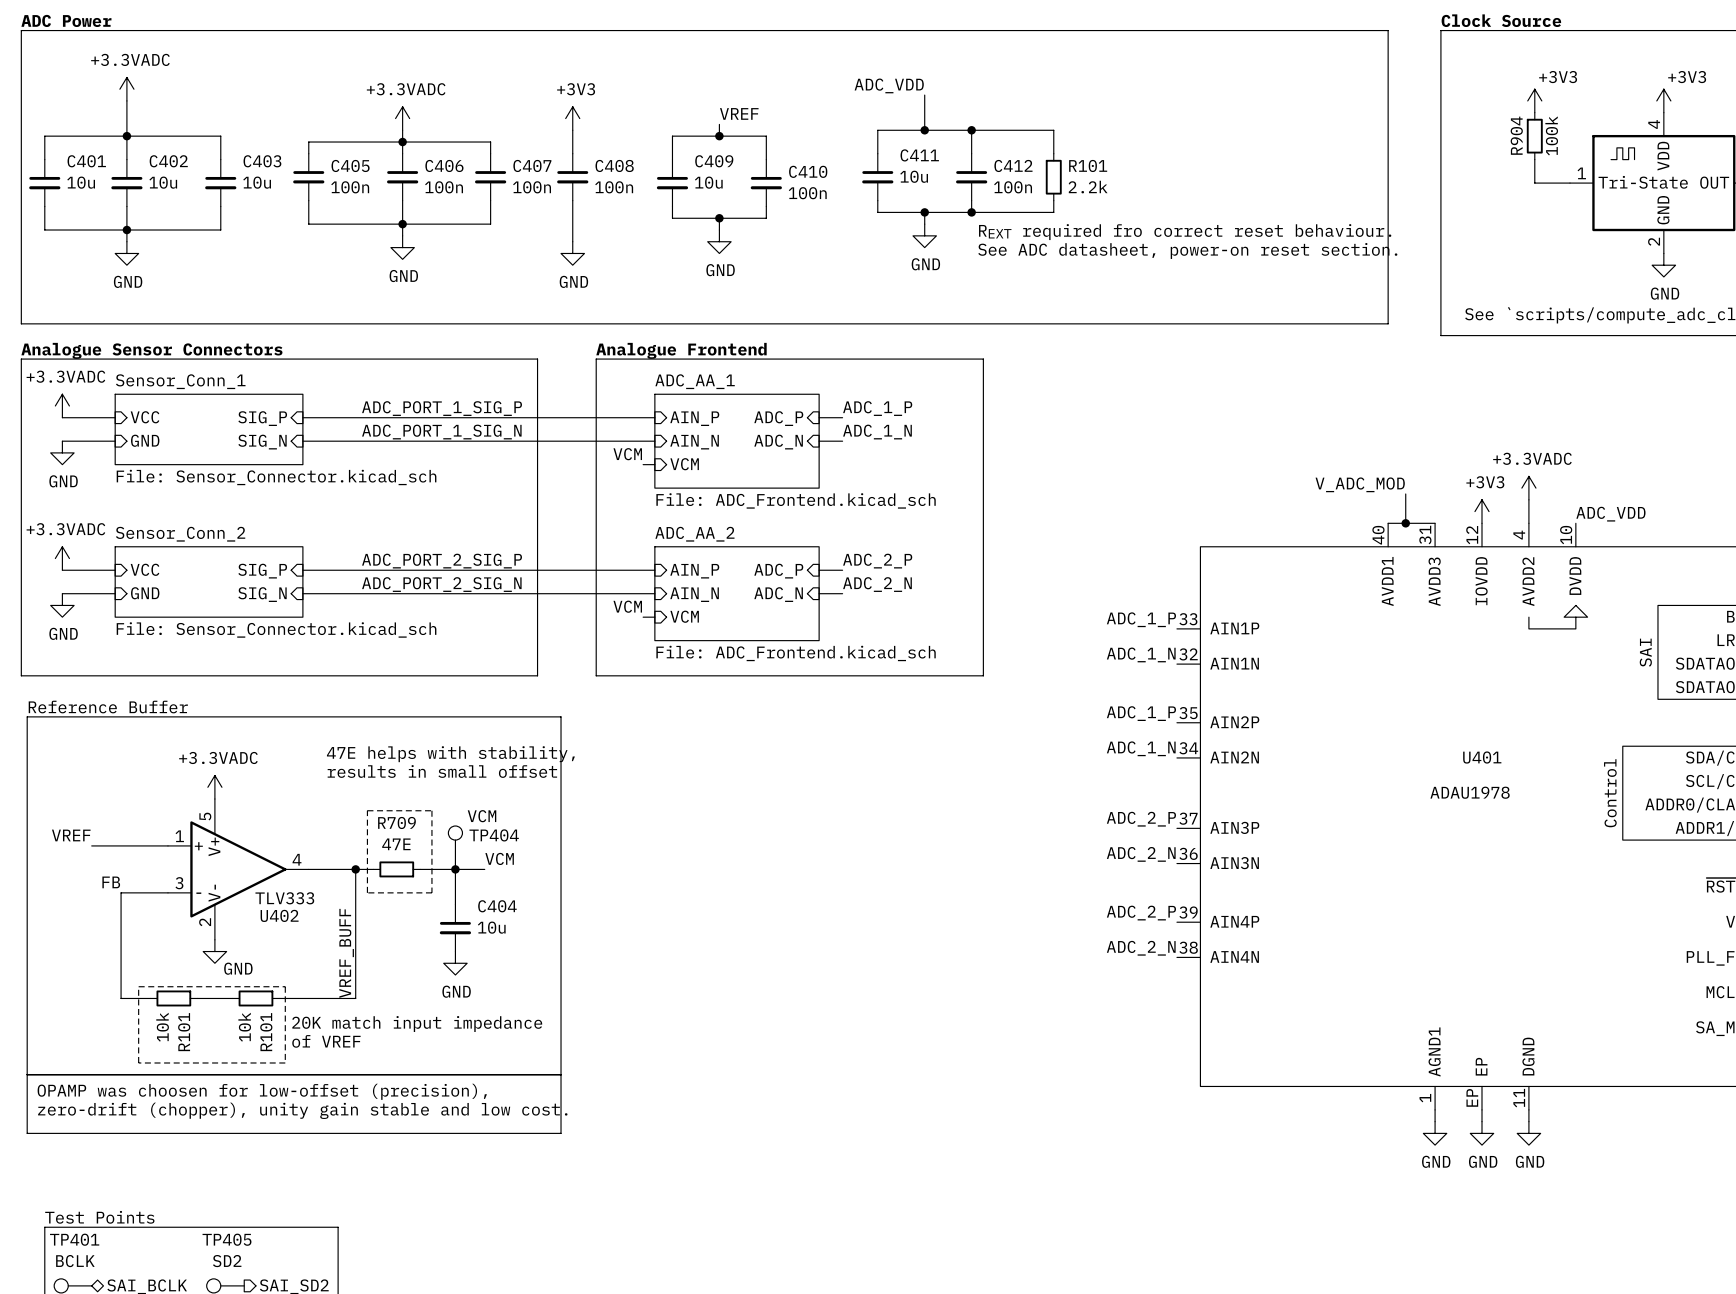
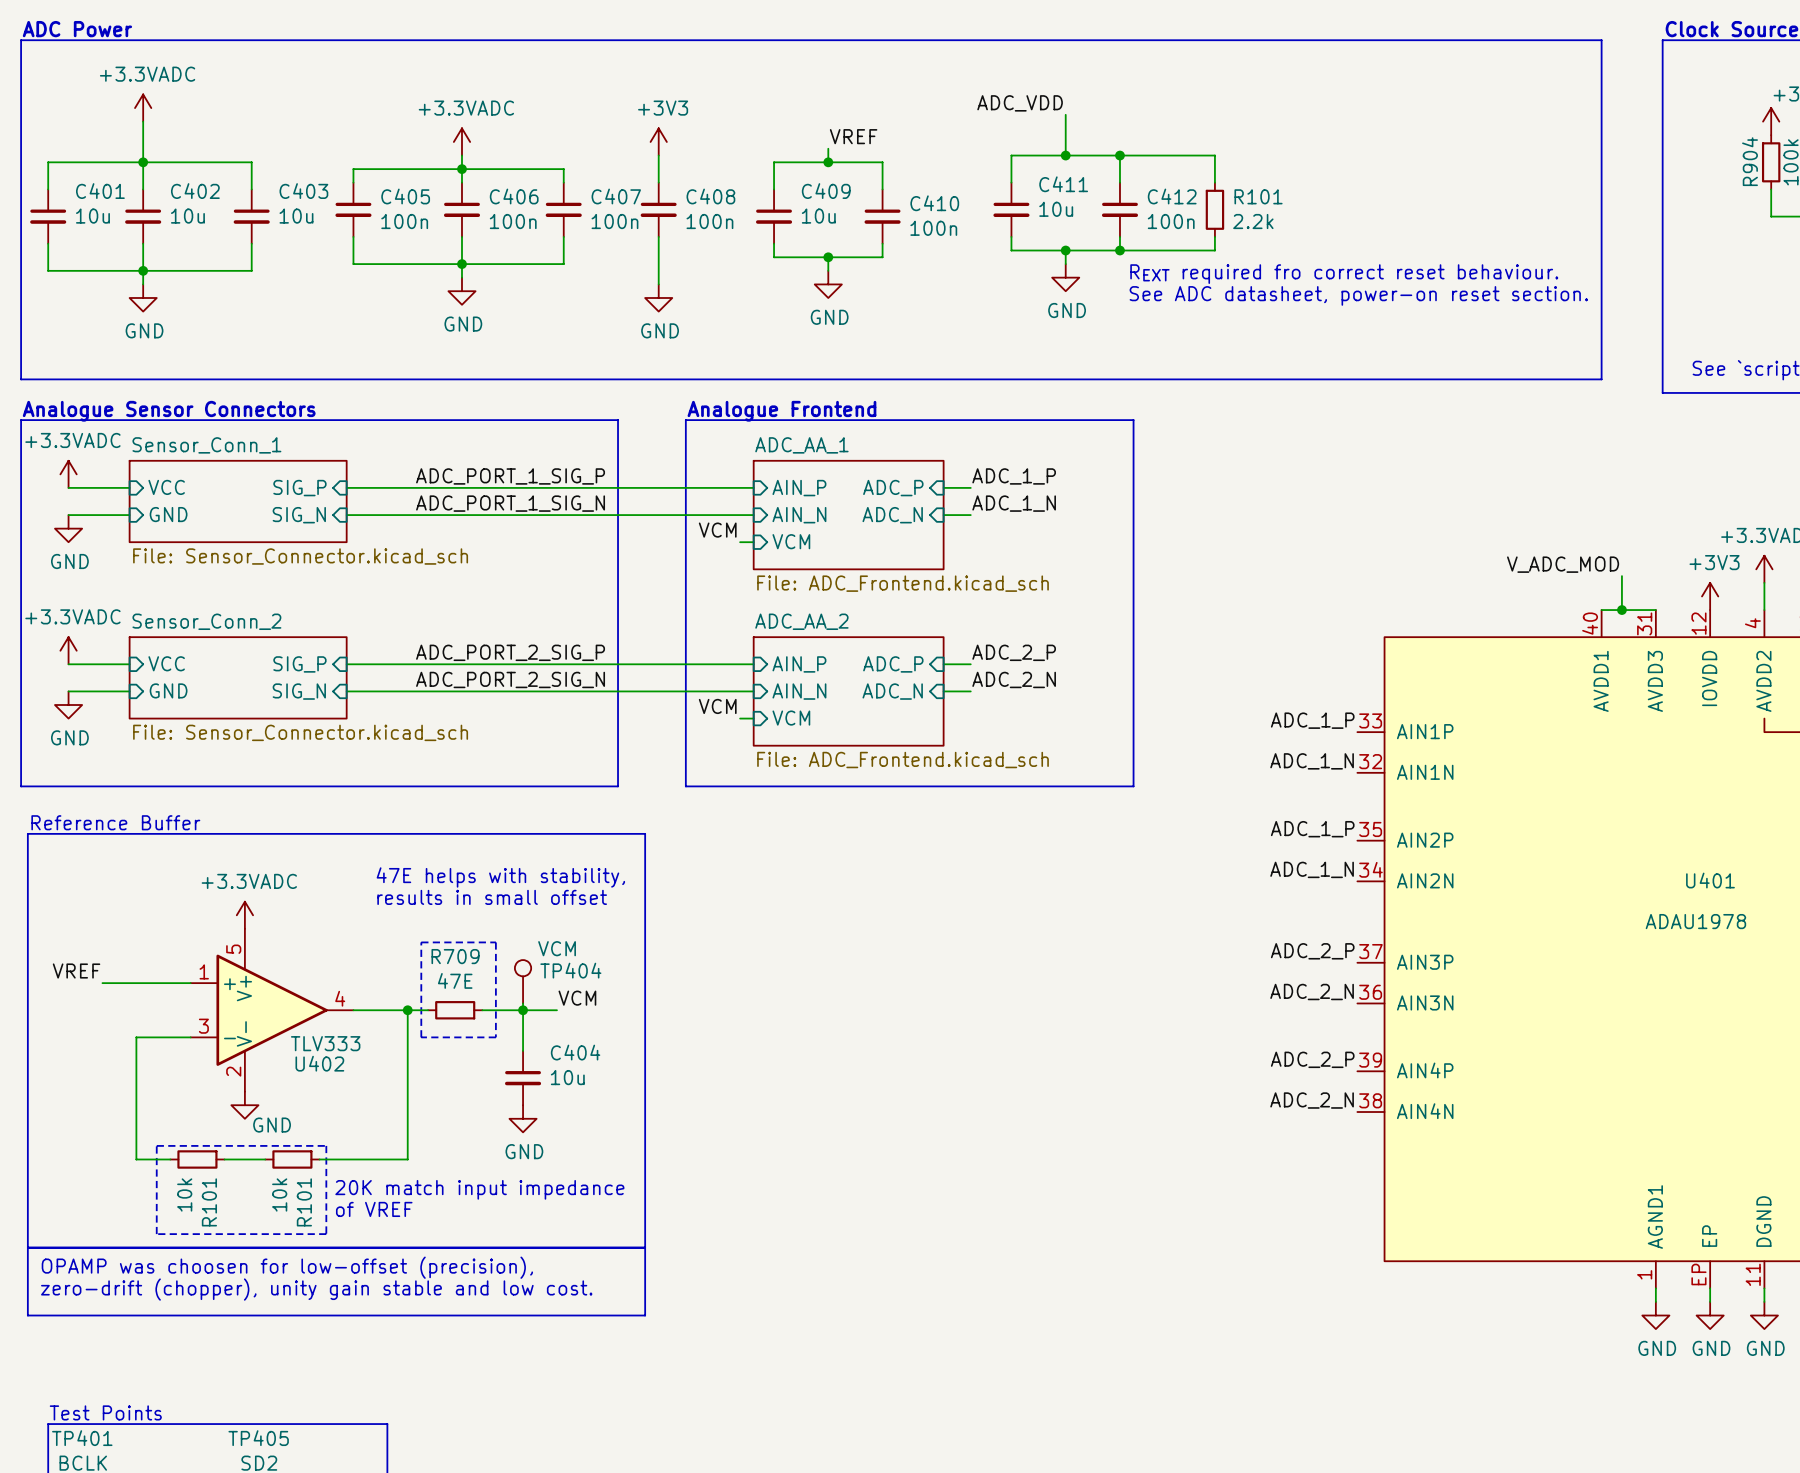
label: FB (111, 882) -> none
label: VREF_BUFF (346, 953) -> none

